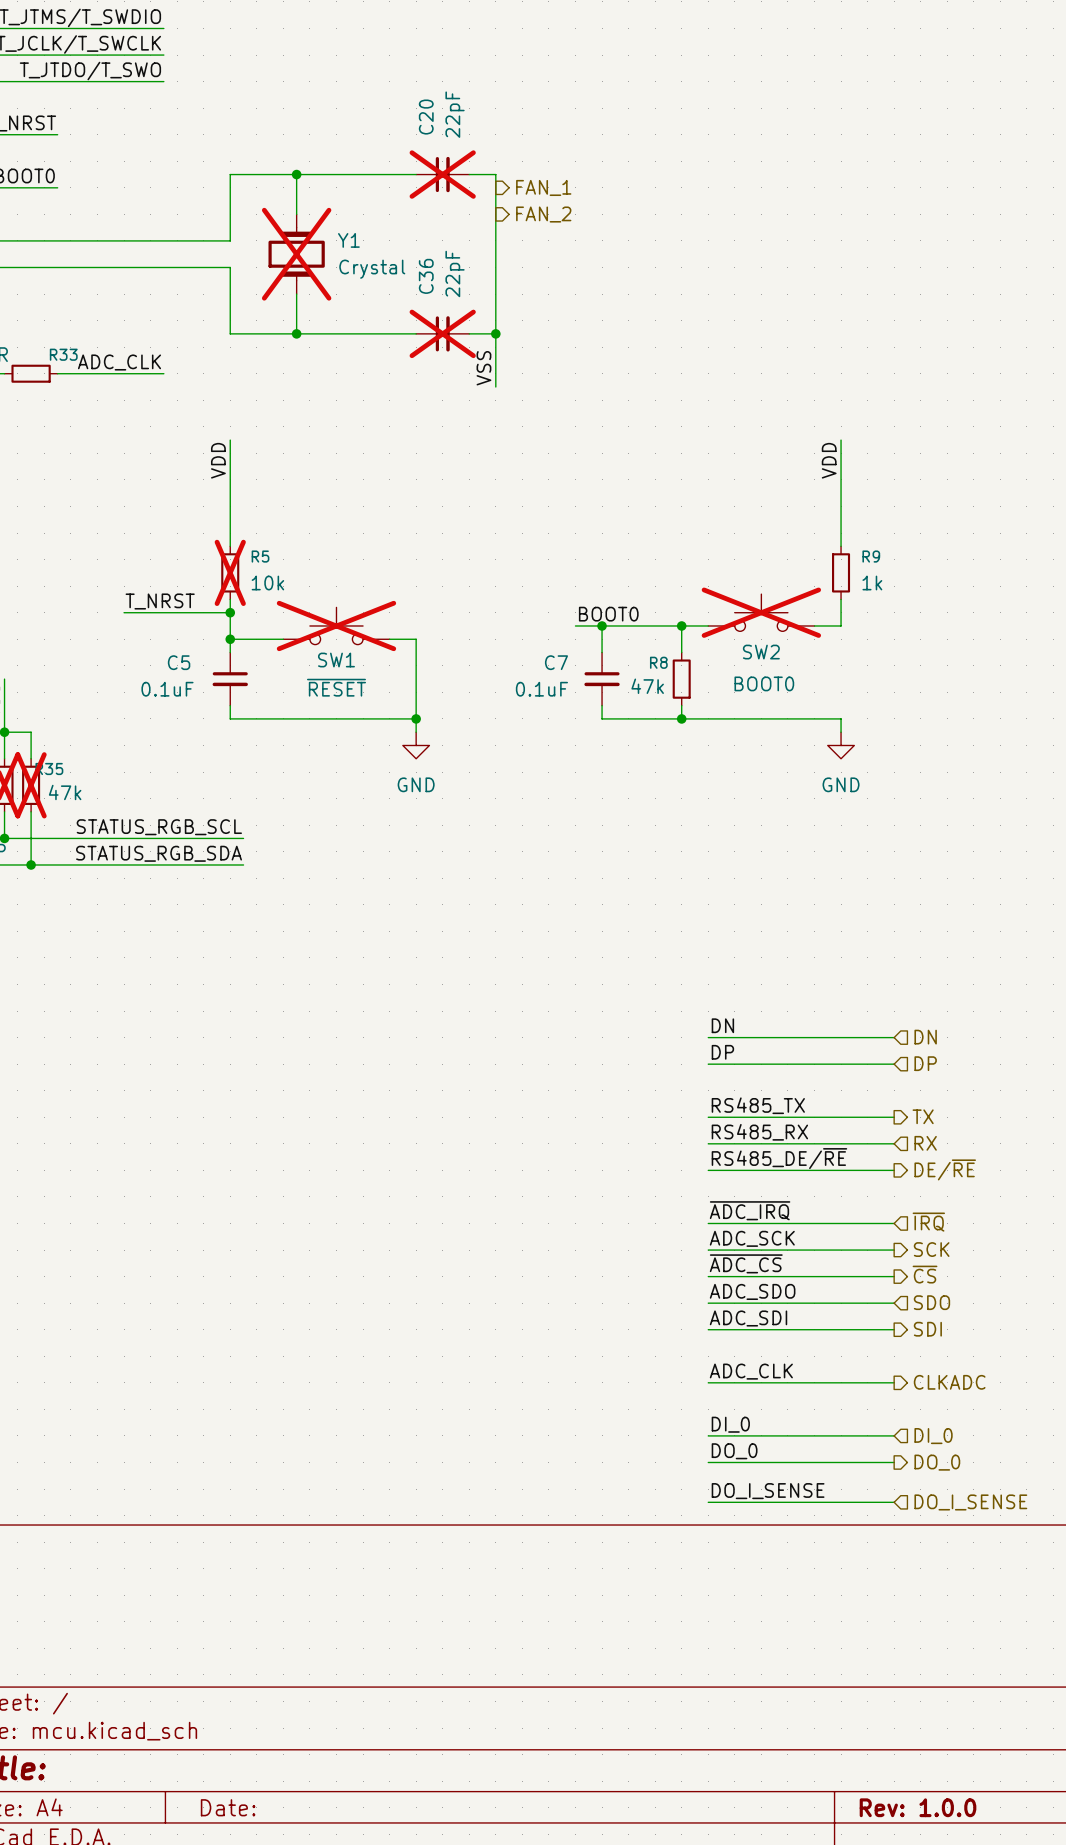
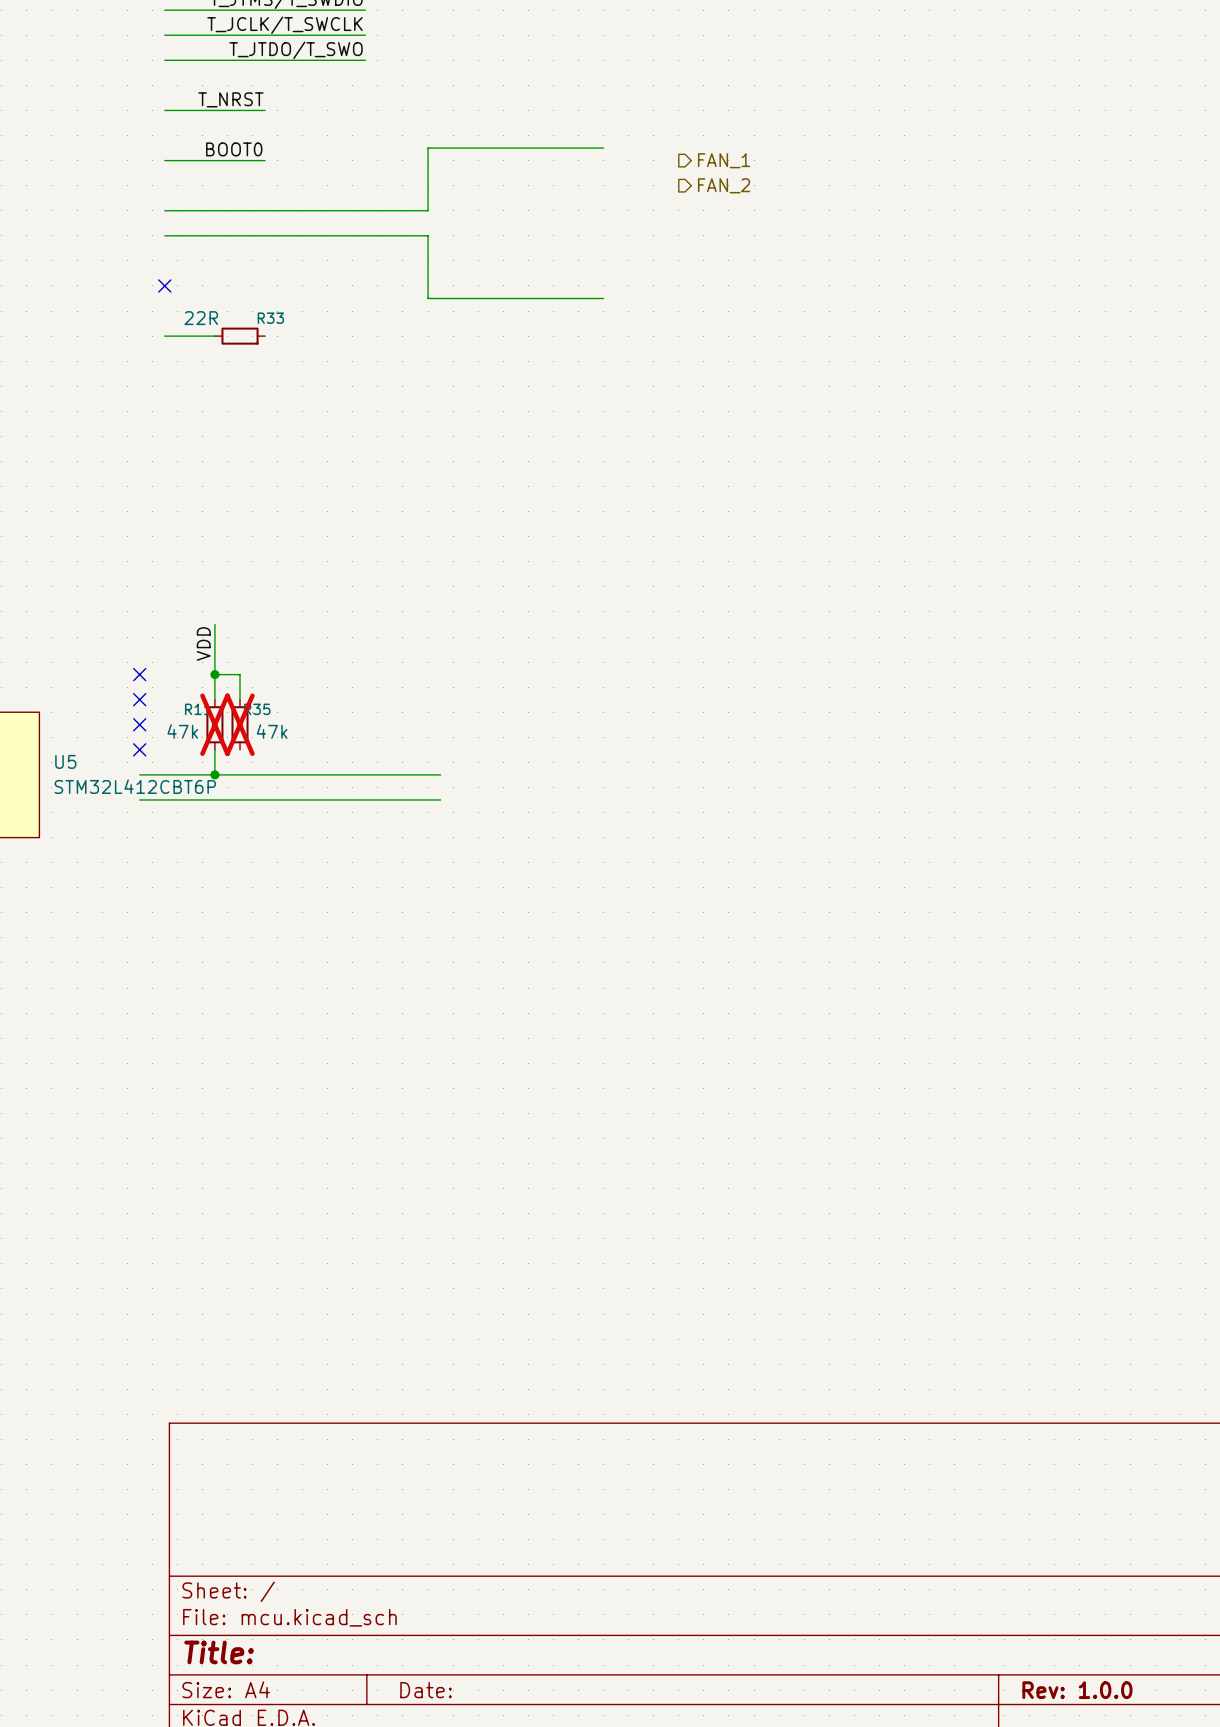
wire: (296, 174) (296, 214) -> none
junction: (296, 174) -> none
C20: 22pF (442, 174) -> none
wire: (469, 174) (495, 174) (495, 386) -> none
Y1: Crystal (296, 254) -> none
wire: (296, 294) (296, 333) -> none
junction: (296, 333) -> none
C36: 22pF (442, 333) -> none
wire: (469, 333) (495, 333) -> none
junction: (495, 333) -> none
label: ADC_CLK (119, 362) -> none
label: VSS (483, 368) -> none
wire: (57, 373) (163, 373) -> none
wire: (230, 440) (230, 546) -> none
wire: (841, 440) (841, 546) -> none
label: VDD (218, 460) -> none
label: VDD (829, 460) -> none
R5: 10k (230, 572) -> none
R9: 1k (841, 572) -> none
wire: (230, 599) (230, 652) -> none
wire: (841, 599) (841, 625) (814, 625) -> none
label: T_NRST (160, 601) -> none
wire: (124, 612) (230, 612) -> none
junction: (230, 612) -> none
SW2: BOOT0 (761, 612) -> none
label: BOOT0 (608, 614) -> none
SW1: ~{RESET} (336, 625) -> none
wire: (575, 625) (708, 625) -> none
wire: (602, 625) (602, 652) -> none
junction: (602, 625) -> none
wire: (681, 625) (681, 652) -> none
junction: (681, 625) -> none
wire: (230, 639) (283, 639) -> none
junction: (230, 639) -> none
wire: (389, 639) (416, 639) (416, 732) -> none
C5: 0.1uF (230, 679) -> none
C7: 0.1uF (602, 679) -> none
R8: 47k (681, 679) -> none
wire: (230, 705) (230, 718) (416, 718) -> none
wire: (602, 705) (602, 718) (841, 718) (841, 732) -> none
wire: (681, 705) (681, 718) -> none
junction: (416, 718) -> none
junction: (681, 718) -> none
power symbol: GND (416, 745) -> none
power symbol: GND (841, 745) -> none
wire: (31, 811) (31, 864) -> none
label: STATUS_RGB_SCL (159, 827) -> none
label: STATUS_RGB_SDA (159, 853) -> none
junction: (31, 864) -> none
label: DN (722, 1025) -> none
wire: (708, 1037) (894, 1037) -> none
hierarchical label: DN (925, 1037) -> none
label: DP (722, 1052) -> none
hierarchical label: DP (925, 1063) -> none
wire: (708, 1064) (894, 1064) -> none
label: RS485_TX (758, 1105) -> none
hierarchical label: TX (923, 1116) -> none
wire: (708, 1117) (894, 1117) -> none
label: RS485_RX (759, 1132) -> none
wire: (708, 1143) (894, 1143) -> none
hierarchical label: RX (925, 1143) -> none
label: RS485_DE/~{RE} (779, 1158) -> none
hierarchical label: DE/~{RE} (945, 1169) -> none
wire: (708, 1170) (894, 1170) -> none
label: ~{ADC_IRQ} (750, 1210) -> none
hierarchical label: ~{IRQ} (928, 1222) -> none
wire: (708, 1223) (894, 1223) -> none
label: ADC_SCK (752, 1238) -> none
hierarchical label: SCK (931, 1249) -> none
wire: (708, 1250) (894, 1250) -> none
label: ~{ADC_CS} (746, 1263) -> none
hierarchical label: ~{CS} (925, 1274) -> none
wire: (708, 1276) (894, 1276) -> none
label: ADC_SDO (752, 1291) -> none
hierarchical label: SDO (931, 1302) -> none
wire: (708, 1303) (894, 1303) -> none
label: ADC_SDI (748, 1318) -> none
wire: (708, 1329) (894, 1329) -> none
hierarchical label: SDI (927, 1329) -> none
label: ADC_CLK (751, 1371) -> none
wire: (708, 1382) (894, 1382) -> none
hierarchical label: CLKADC (949, 1382) -> none
label: DI_0 (730, 1424) -> none
wire: (708, 1435) (894, 1435) -> none
hierarchical label: DI_0 (933, 1436) -> none
label: DO_0 (734, 1451) -> none
wire: (708, 1462) (894, 1462) -> none
hierarchical label: DO_0 (937, 1462) -> none
label: DO_I_SENSE (768, 1491) -> none
wire: (708, 1502) (894, 1502) -> none
hierarchical label: DO_I_SENSE (970, 1502) -> none

